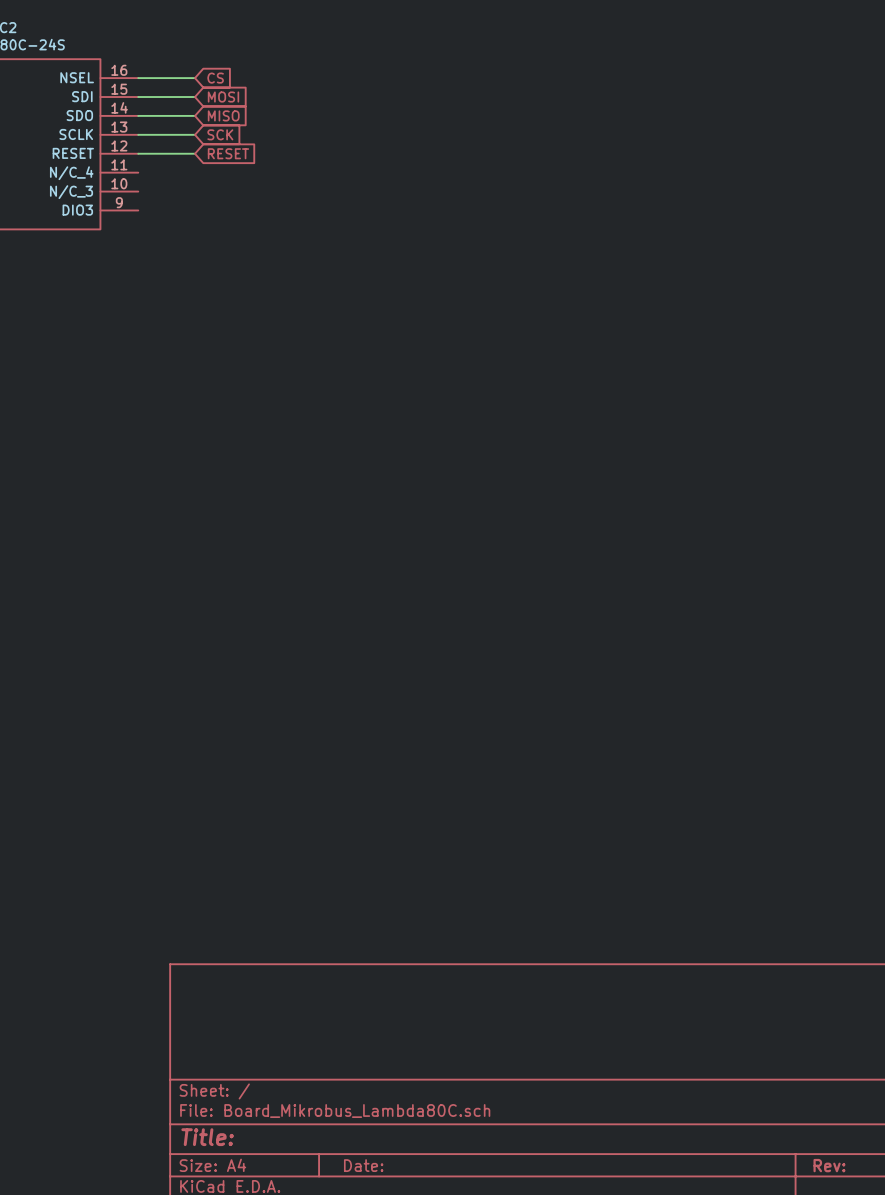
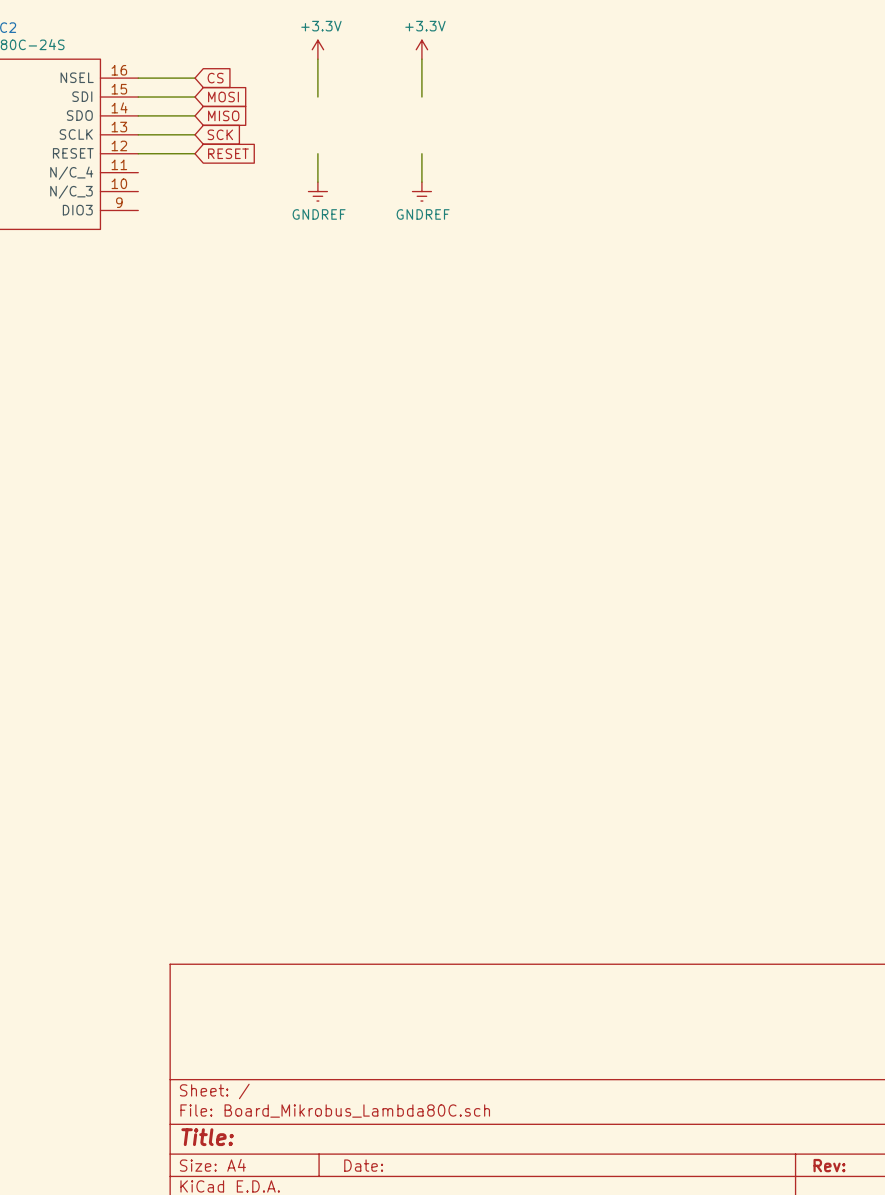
power symbol: none -> +3.3V (317, 49)
power symbol: none -> +3.3V (421, 49)
wire: none -> (317, 59) (317, 97)
wire: none -> (421, 59) (421, 97)
wire: none -> (317, 153) (317, 182)
wire: none -> (421, 153) (421, 182)
power symbol: none -> GNDREF (317, 191)
power symbol: none -> GNDREF (421, 191)

